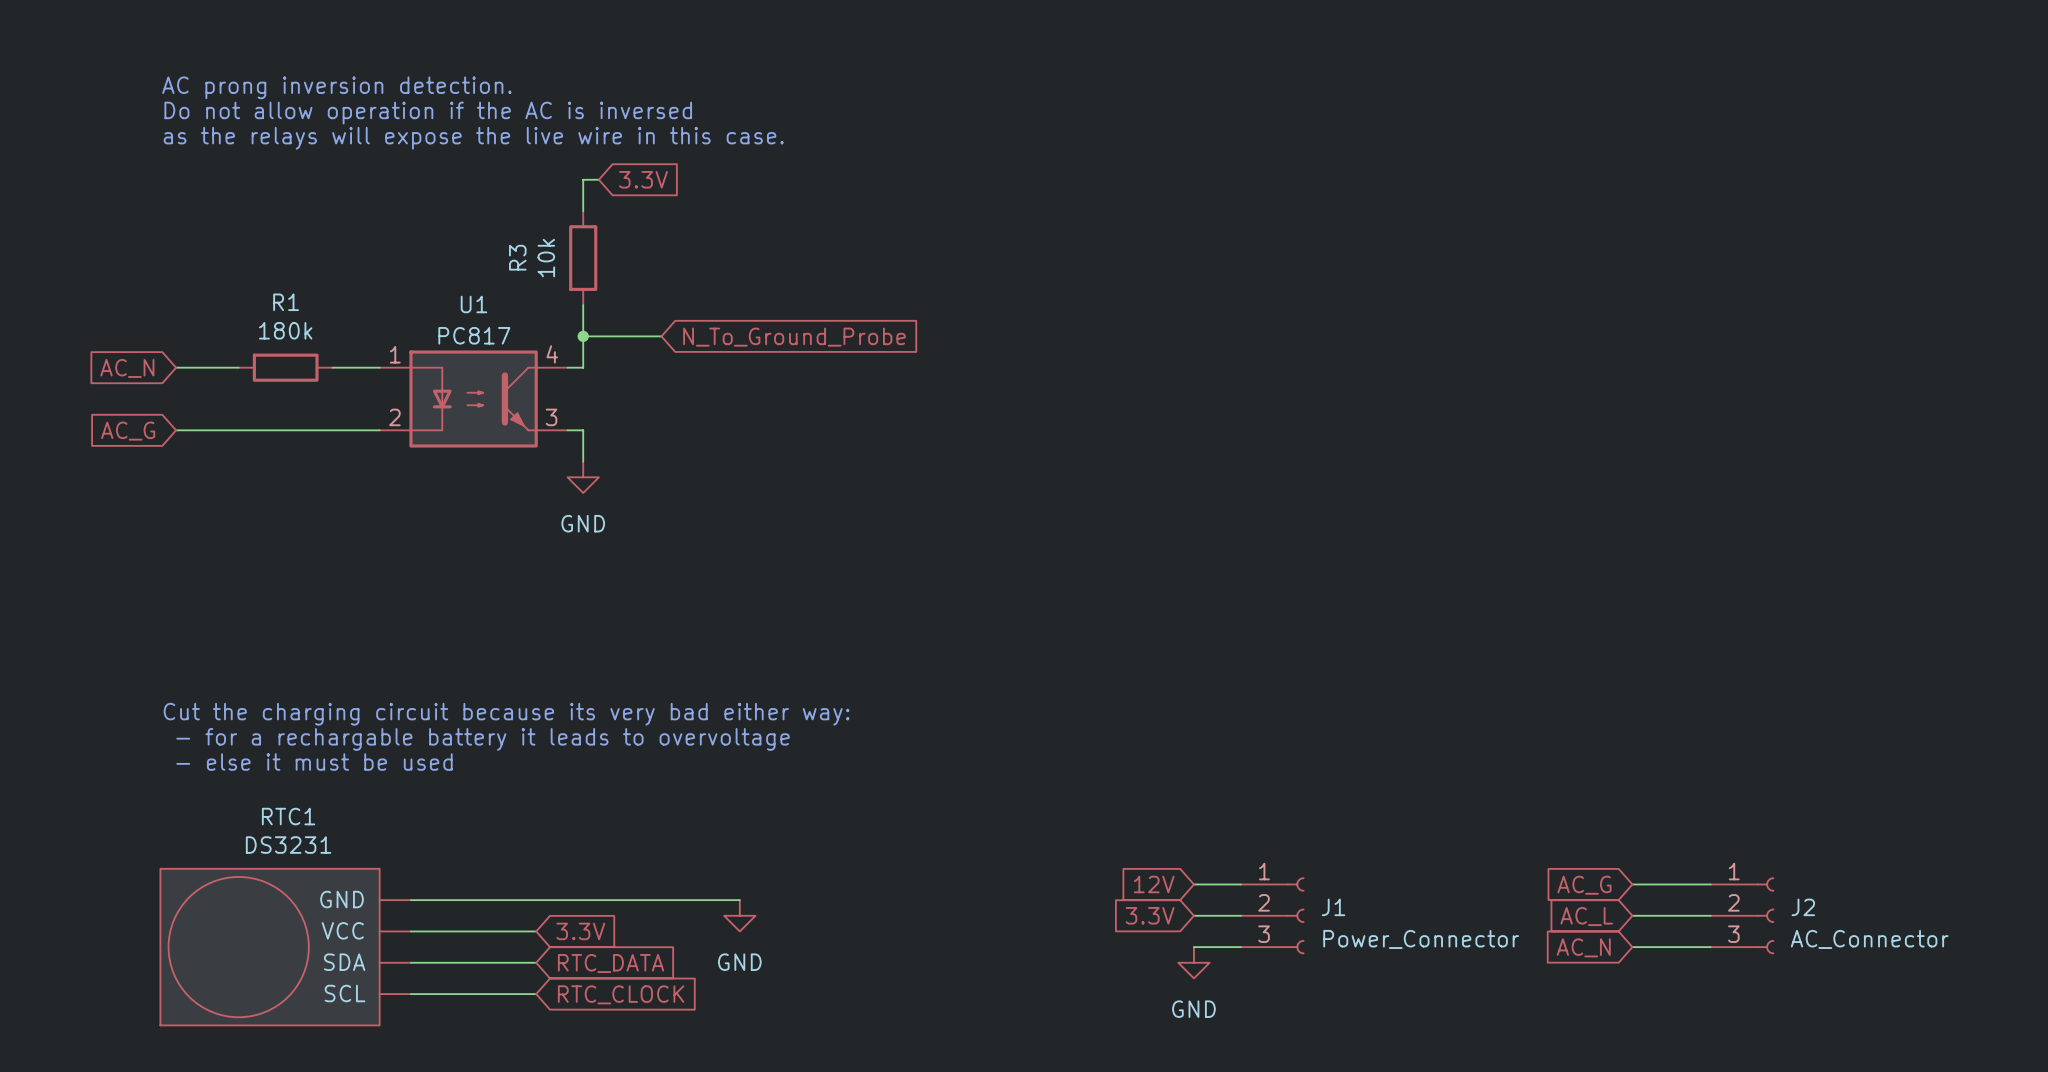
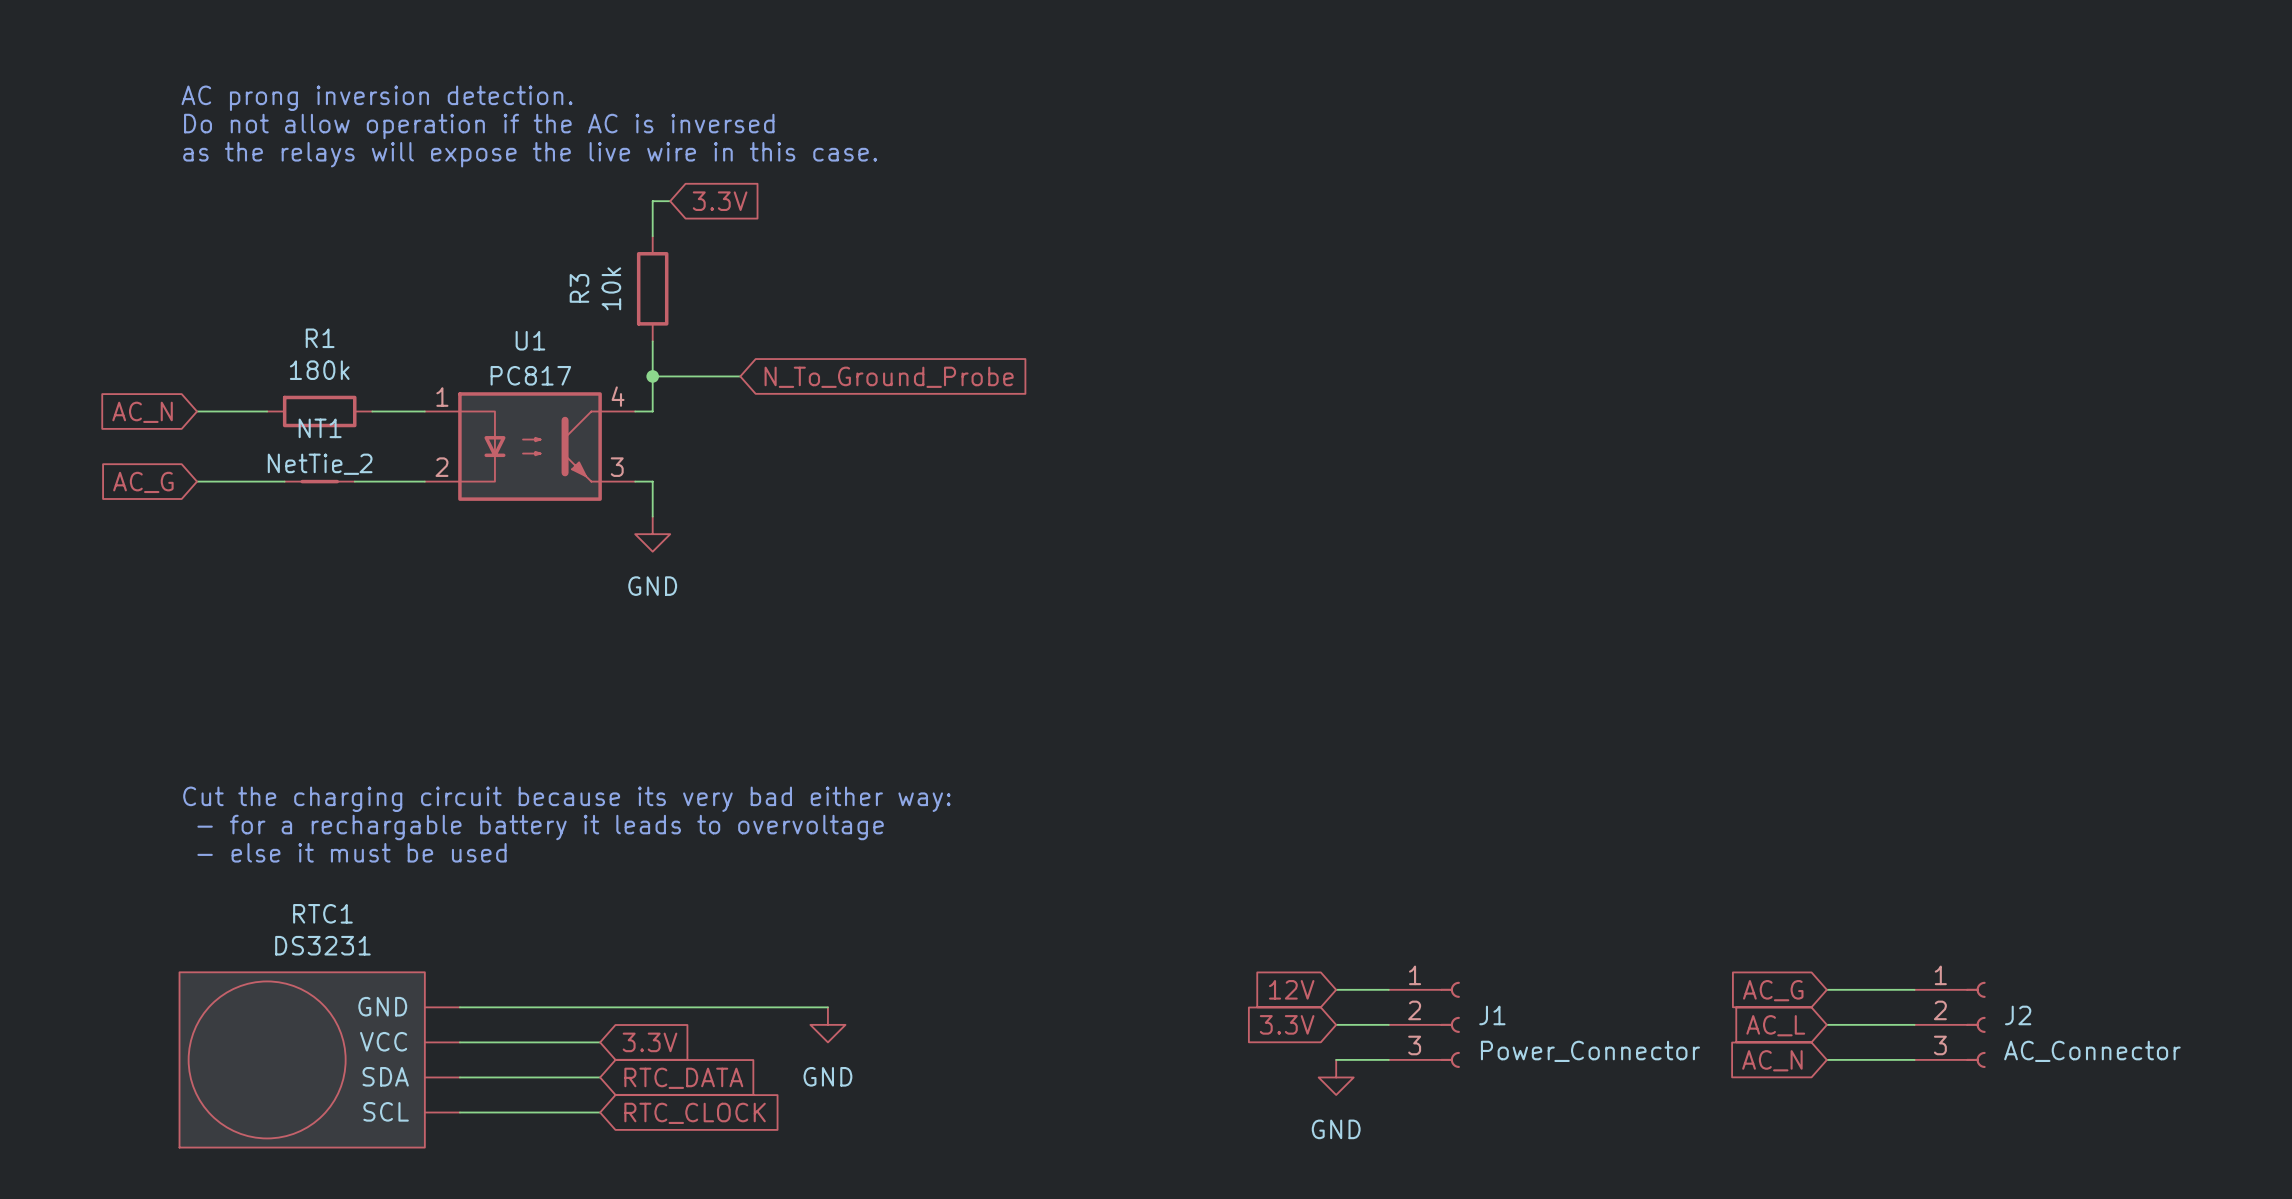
NT1: none -> NetTie_2 (319, 481)

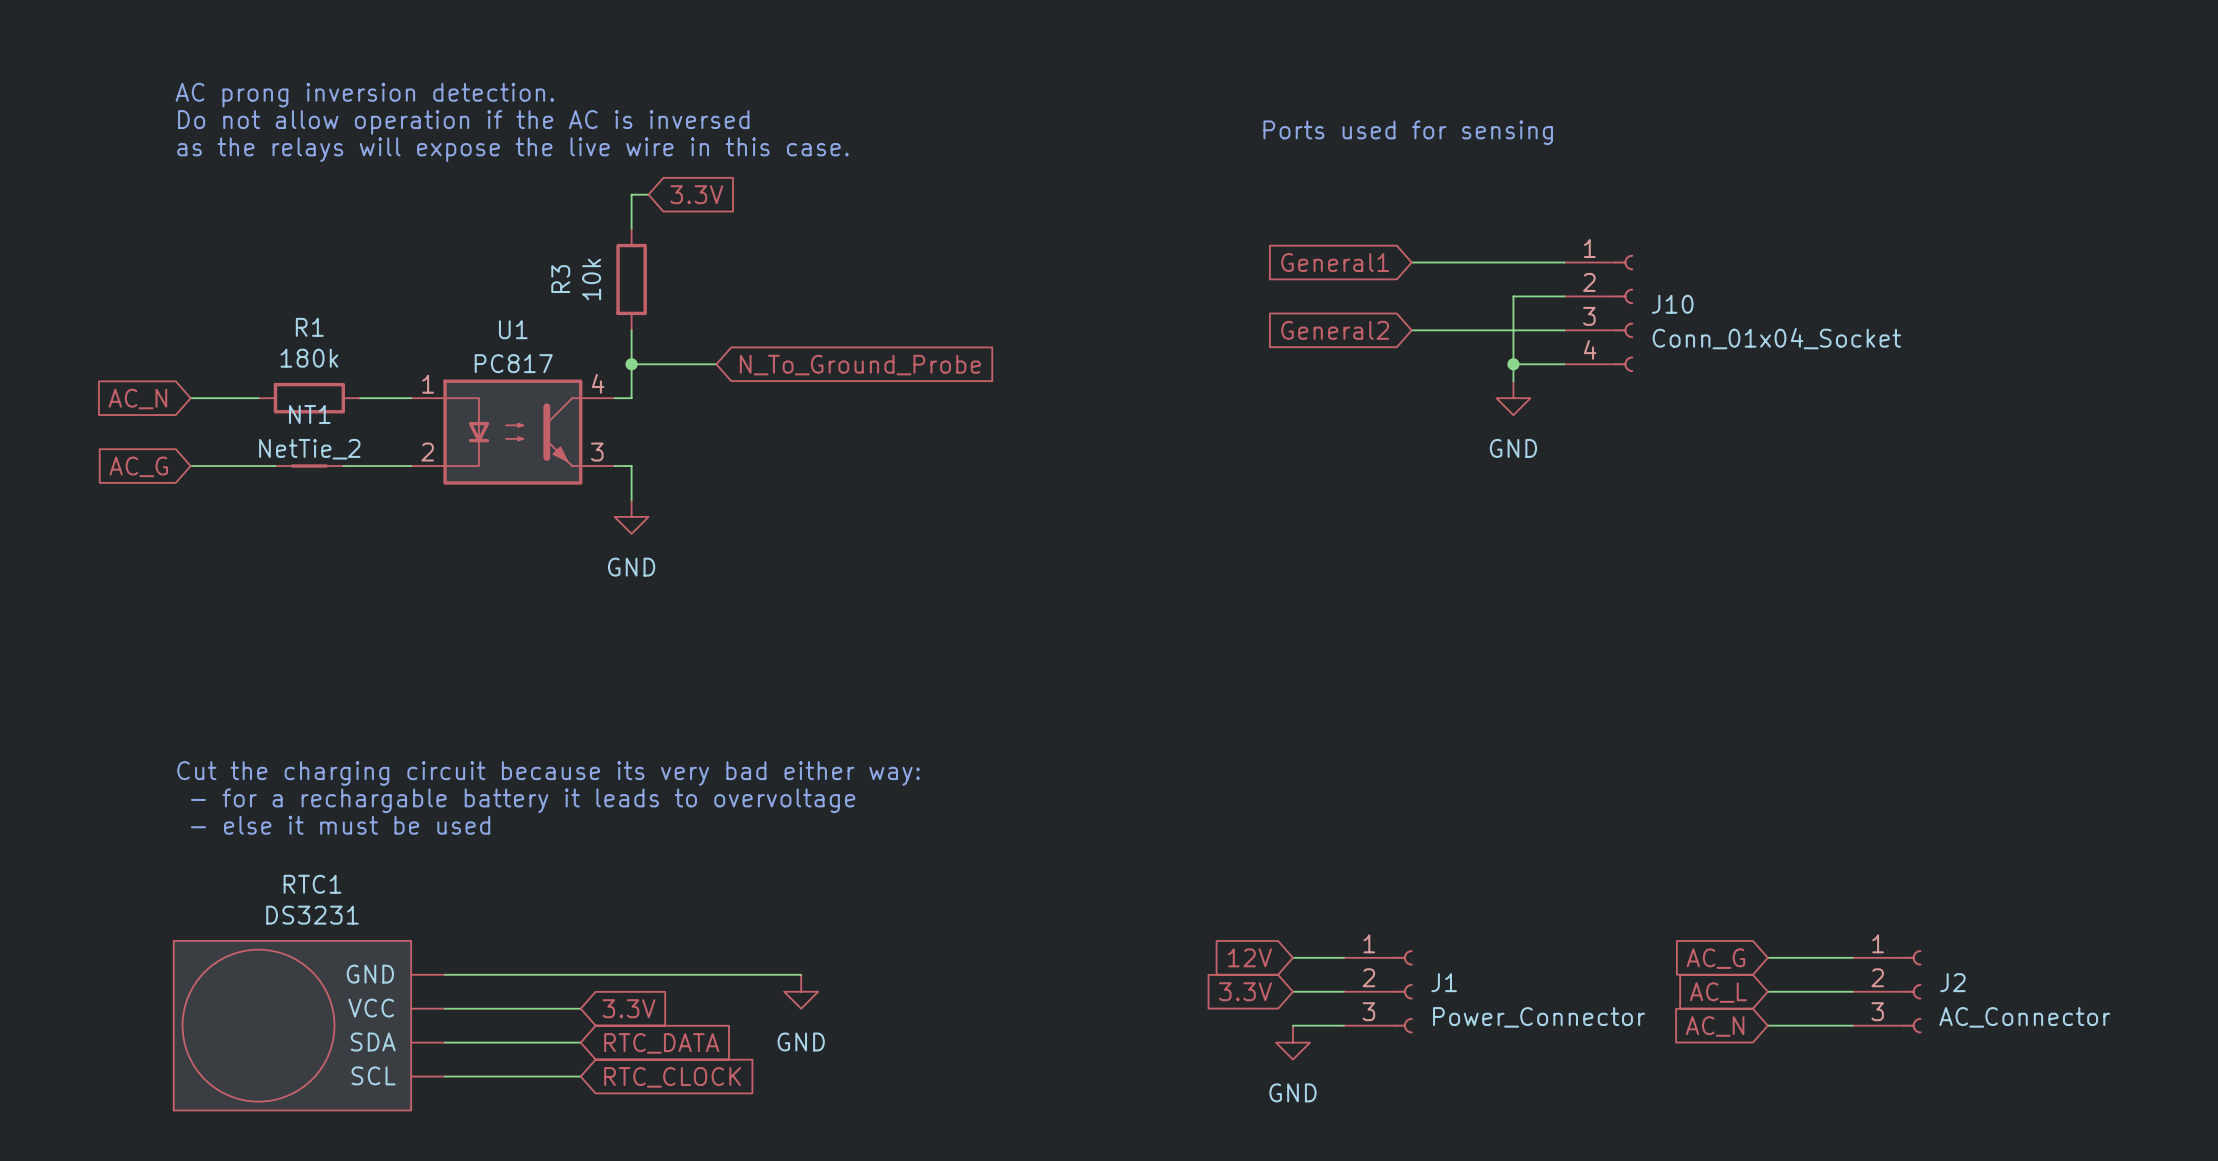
text: none -> Ports used for sensing (1408, 132)
global label: none -> General1 (1335, 262)
wire: none -> (1411, 262) (1564, 262)
wire: none -> (1564, 296) (1513, 296) (1513, 381)
J10: none -> Conn_01x04_Socket (1598, 313)
global label: none -> General2 (1335, 330)
wire: none -> (1411, 330) (1564, 330)
wire: none -> (1513, 364) (1564, 364)
junction: none -> (1513, 364)
power symbol: none -> GND (1513, 398)

